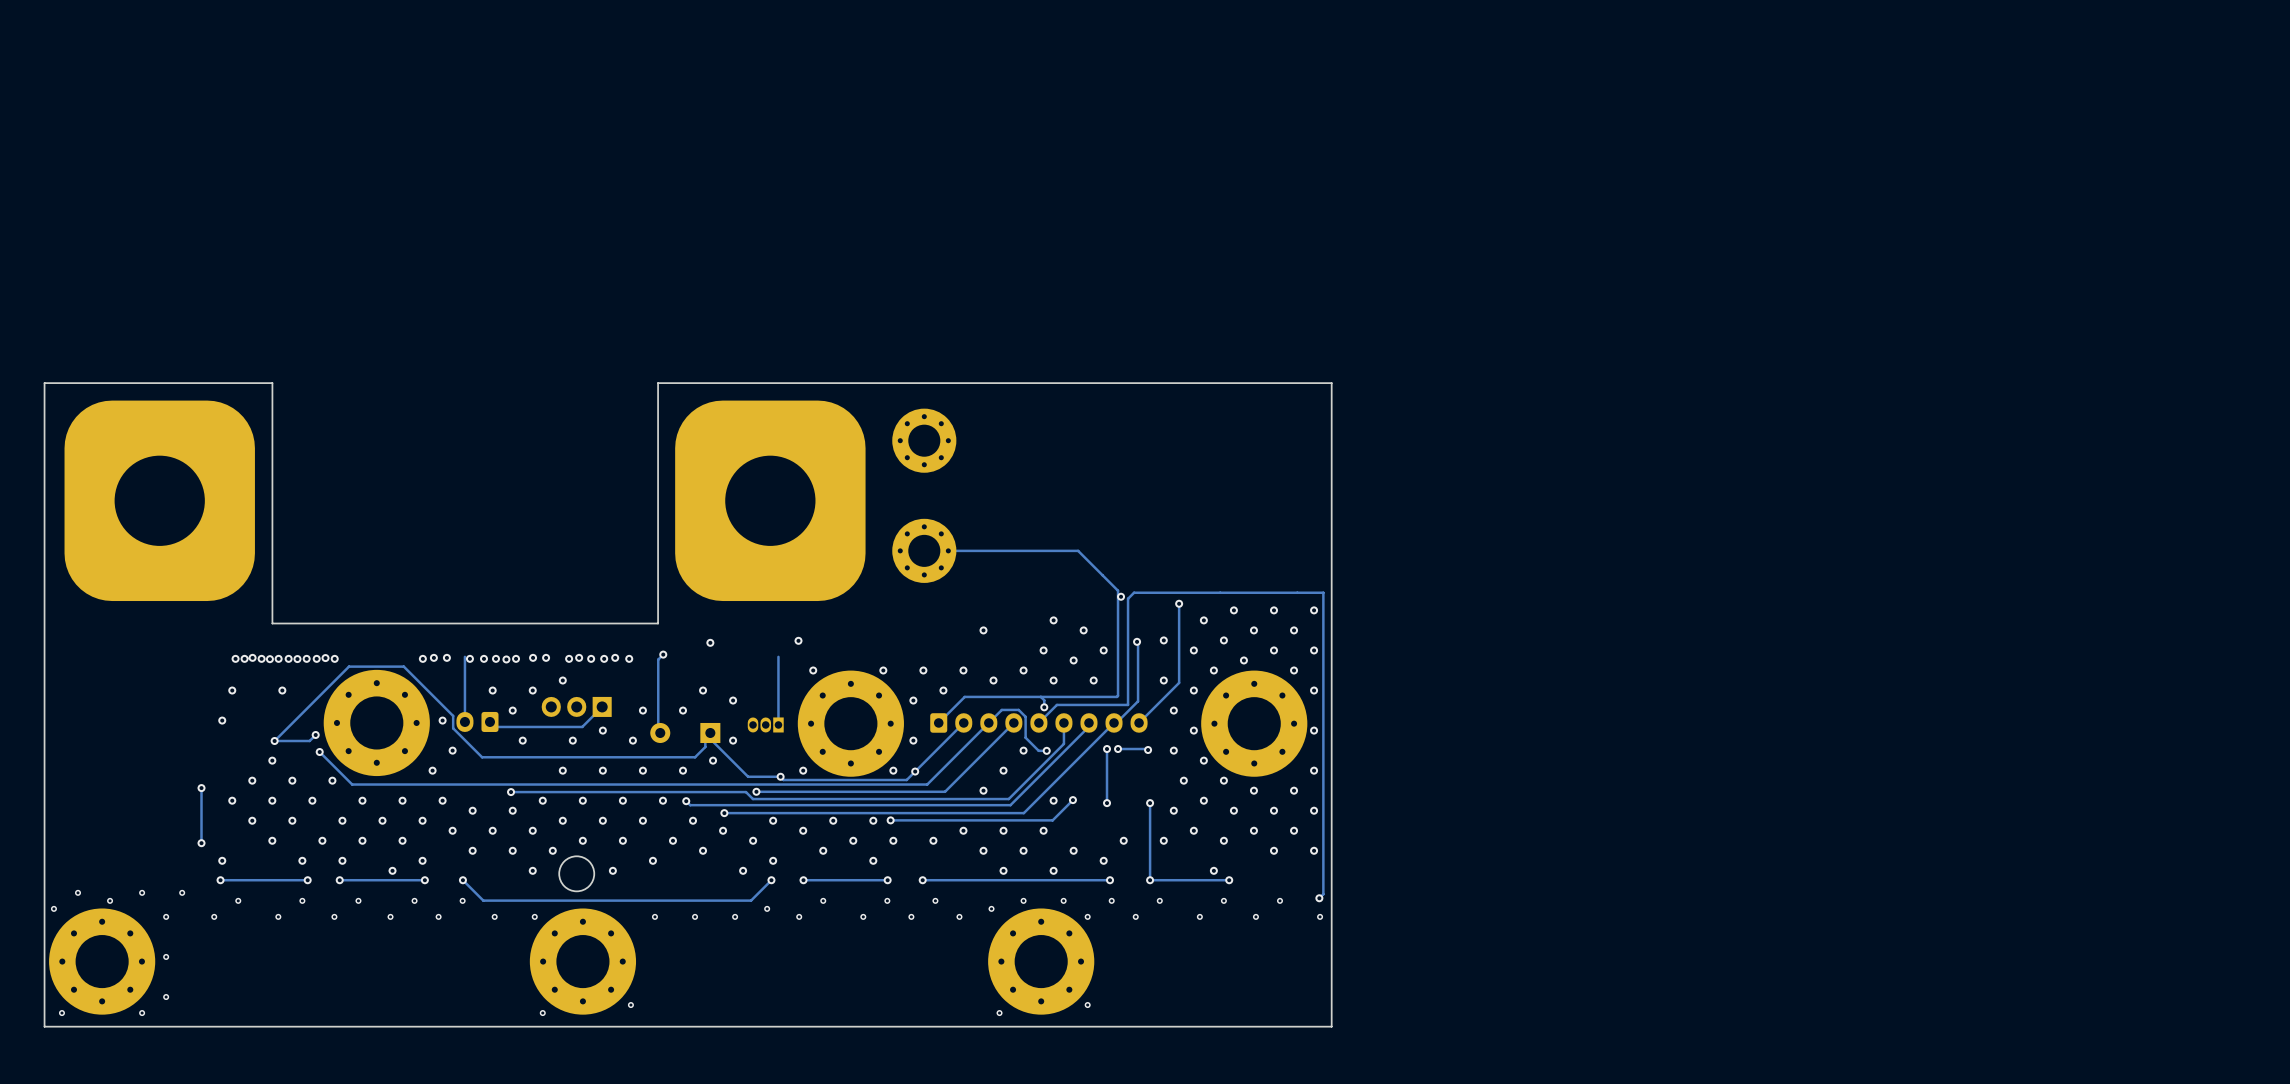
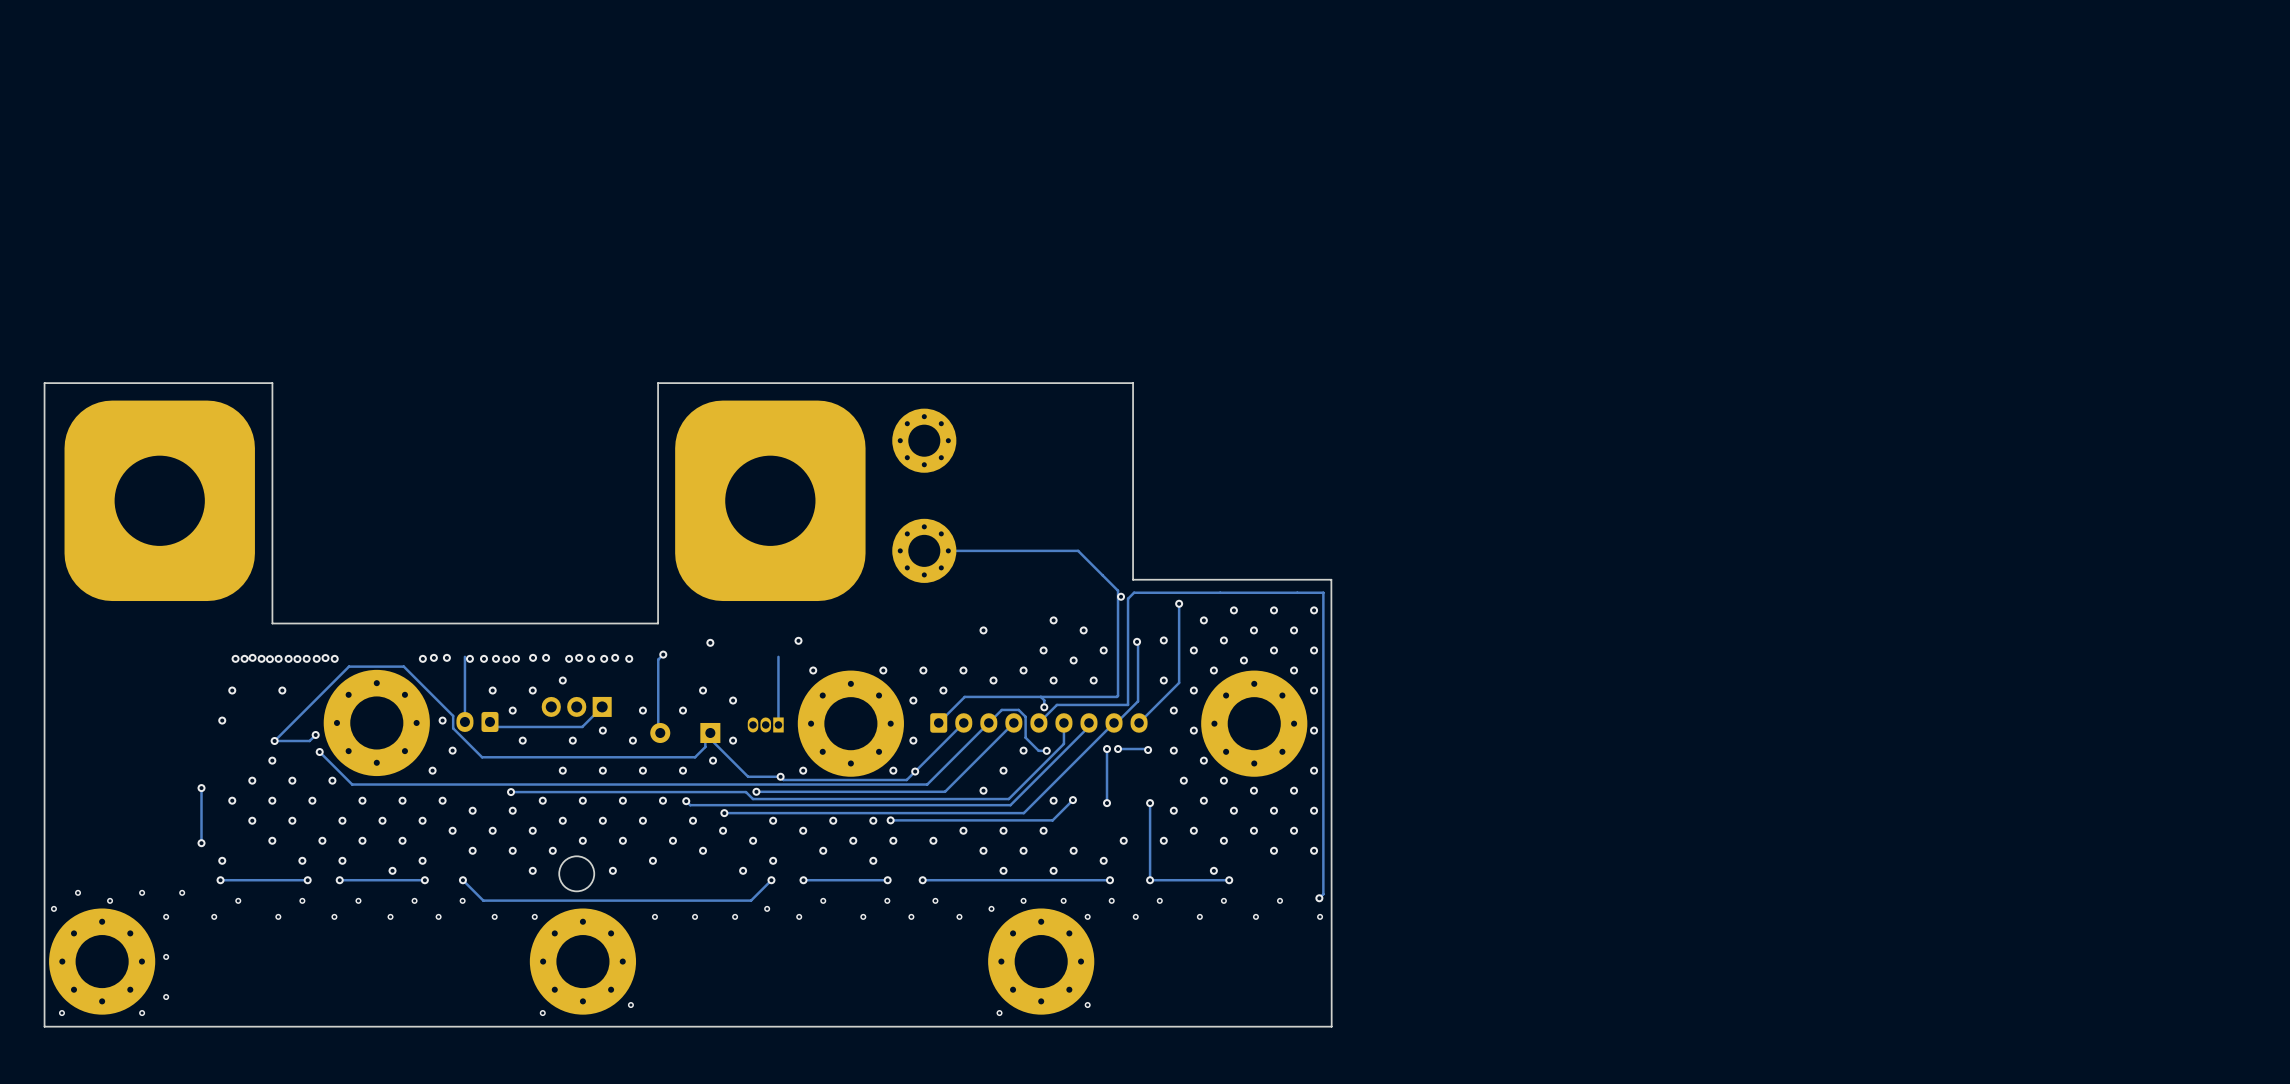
board edge: (1133, 383) (1331, 383) (1331, 1026) -> (1133, 383) (1133, 579) (1331, 579) (1331, 1026)

